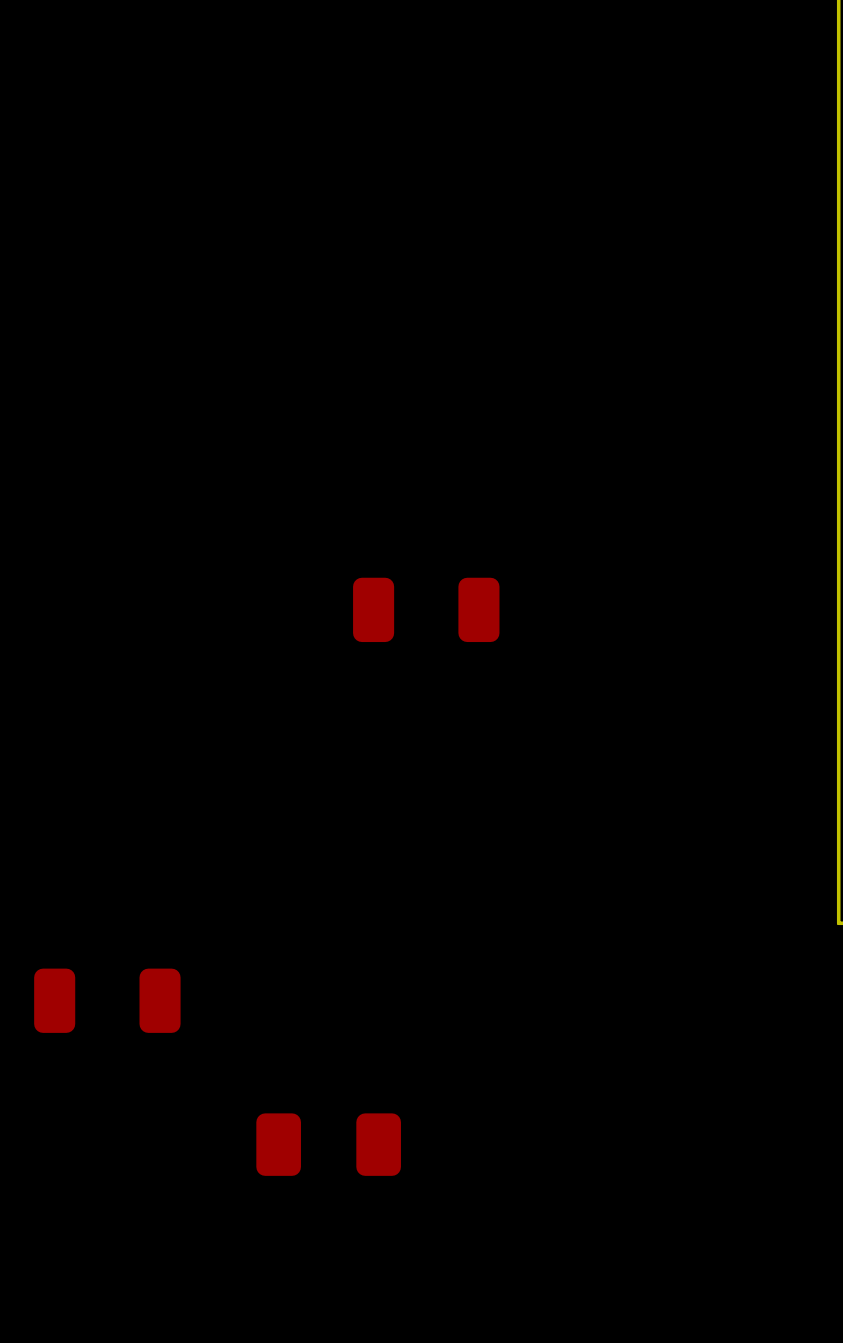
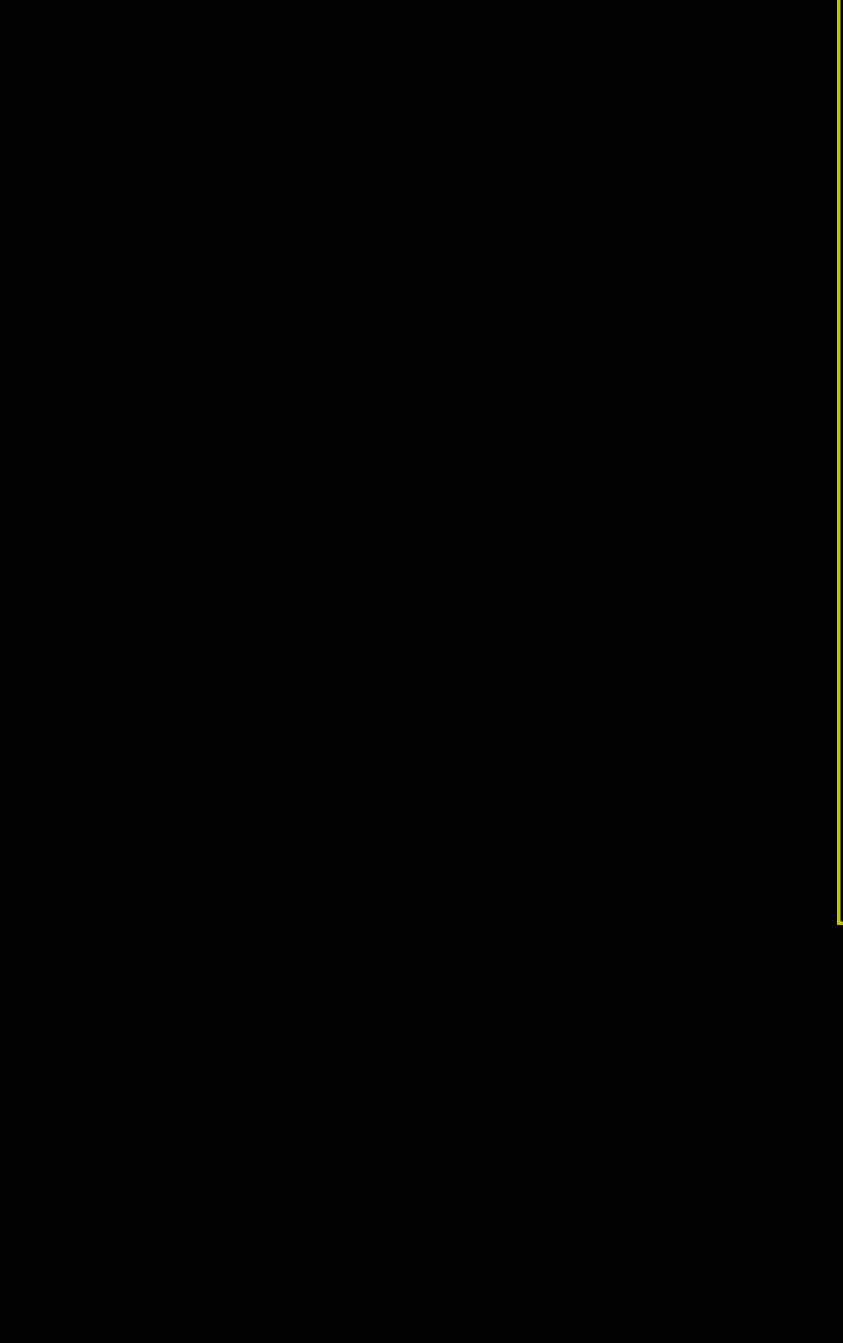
part: (426, 609) -> none
part: (107, 1000) -> none
part: (328, 1144) -> none

